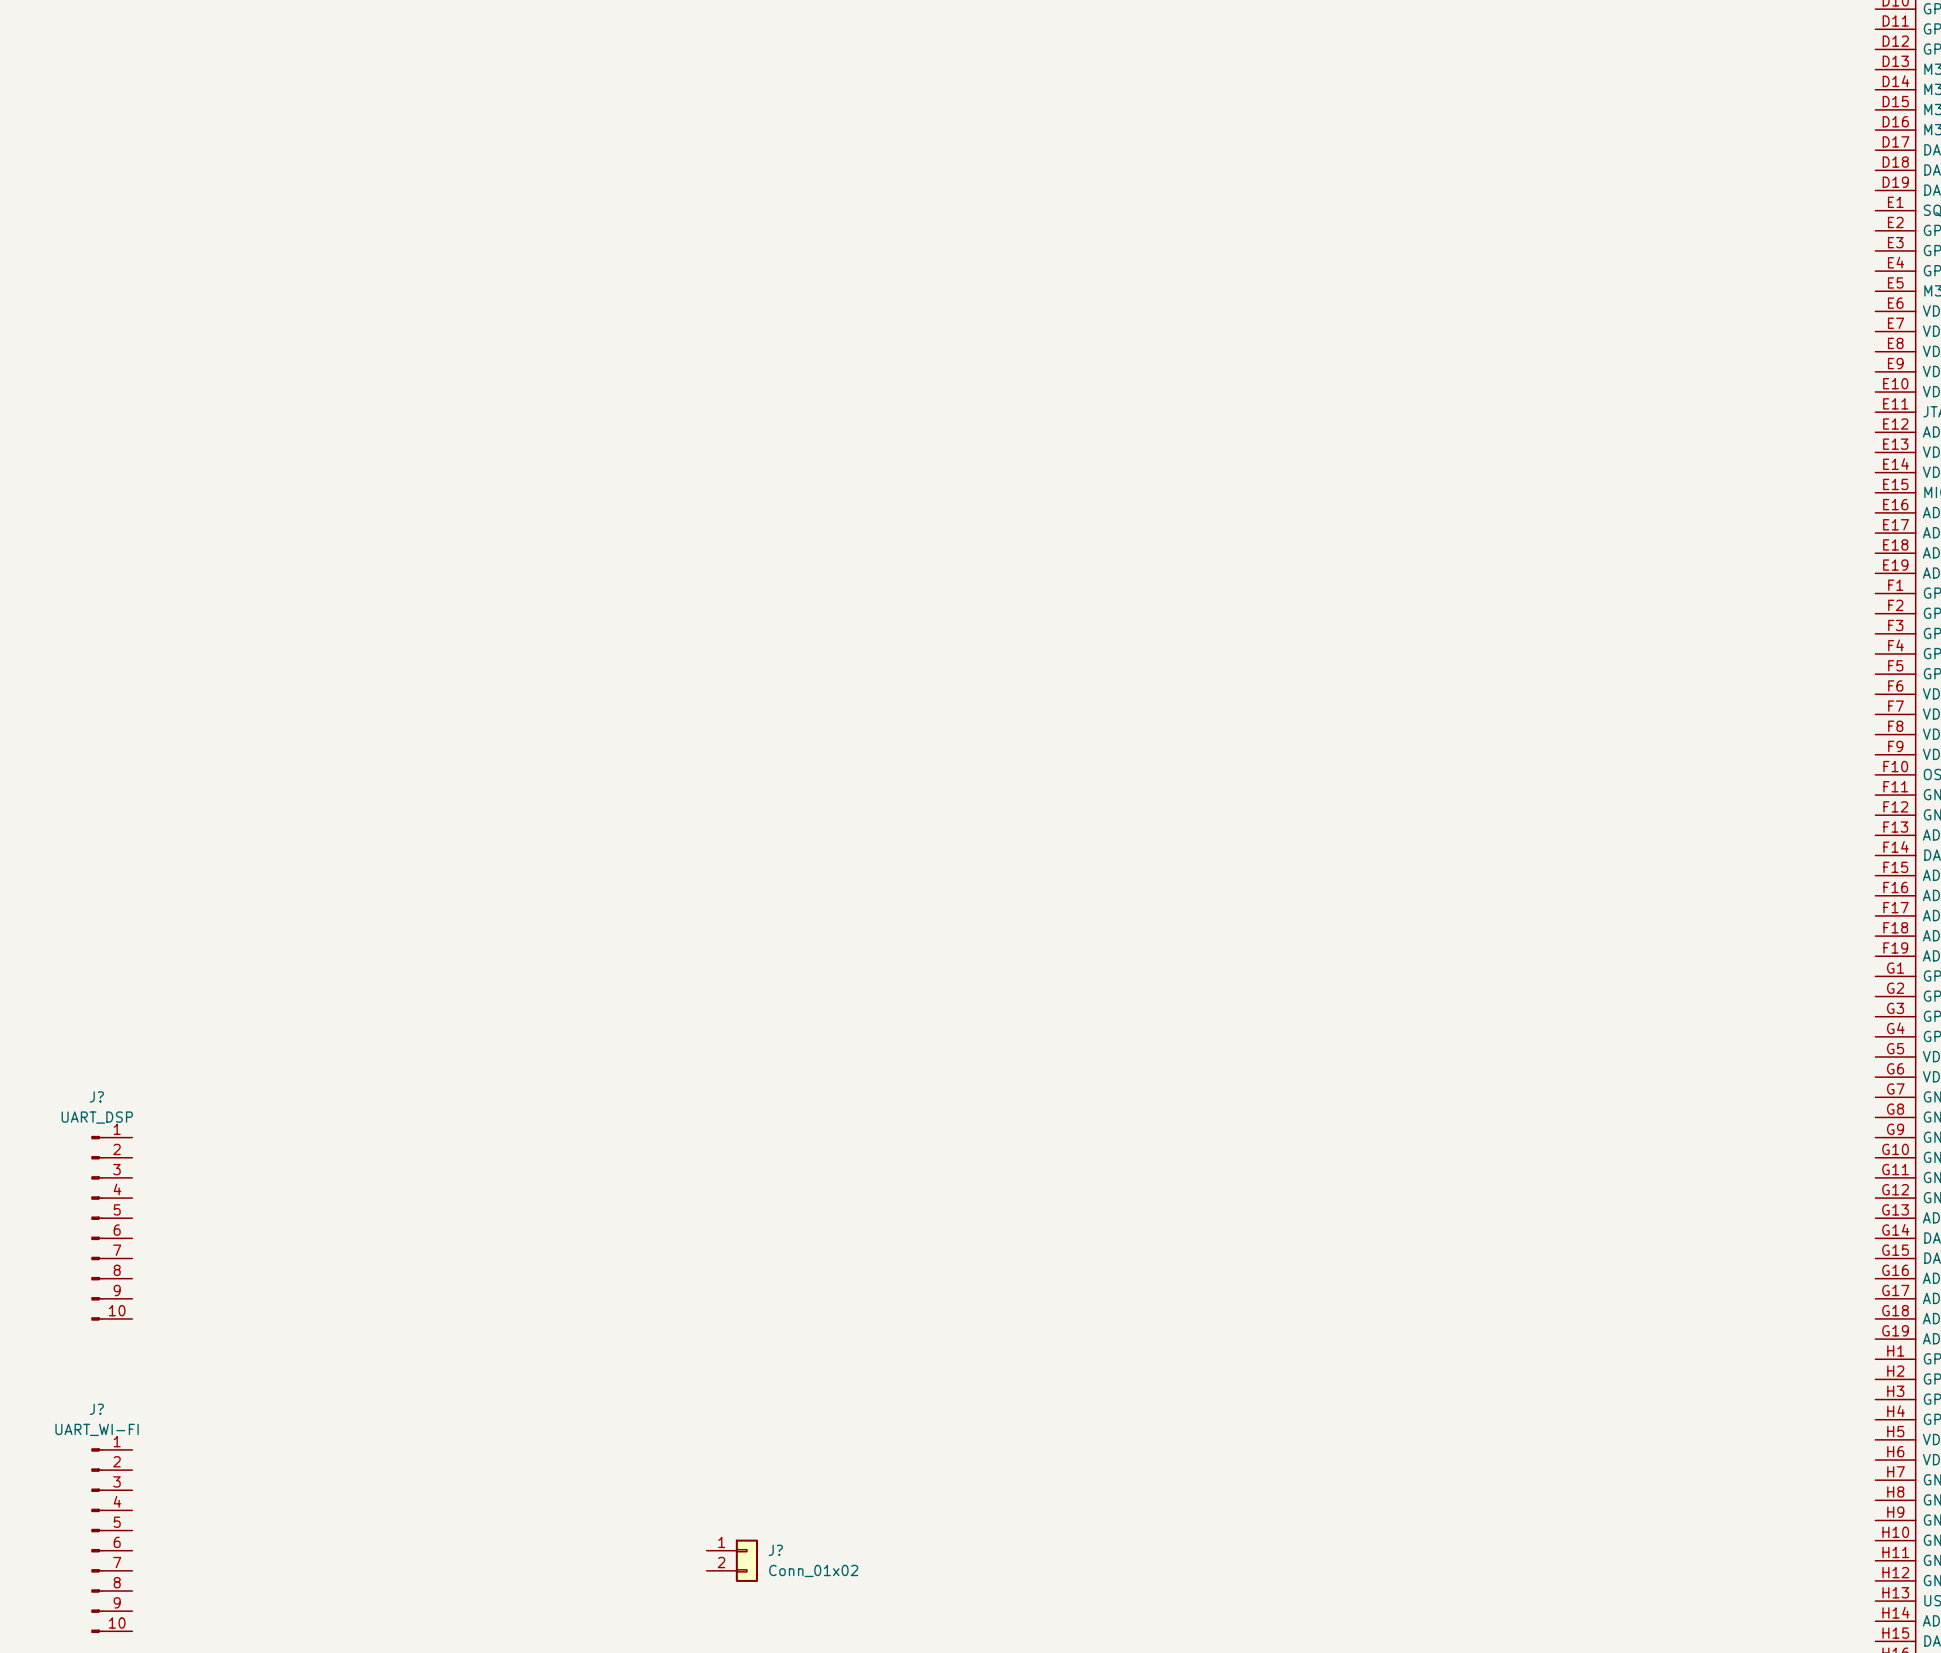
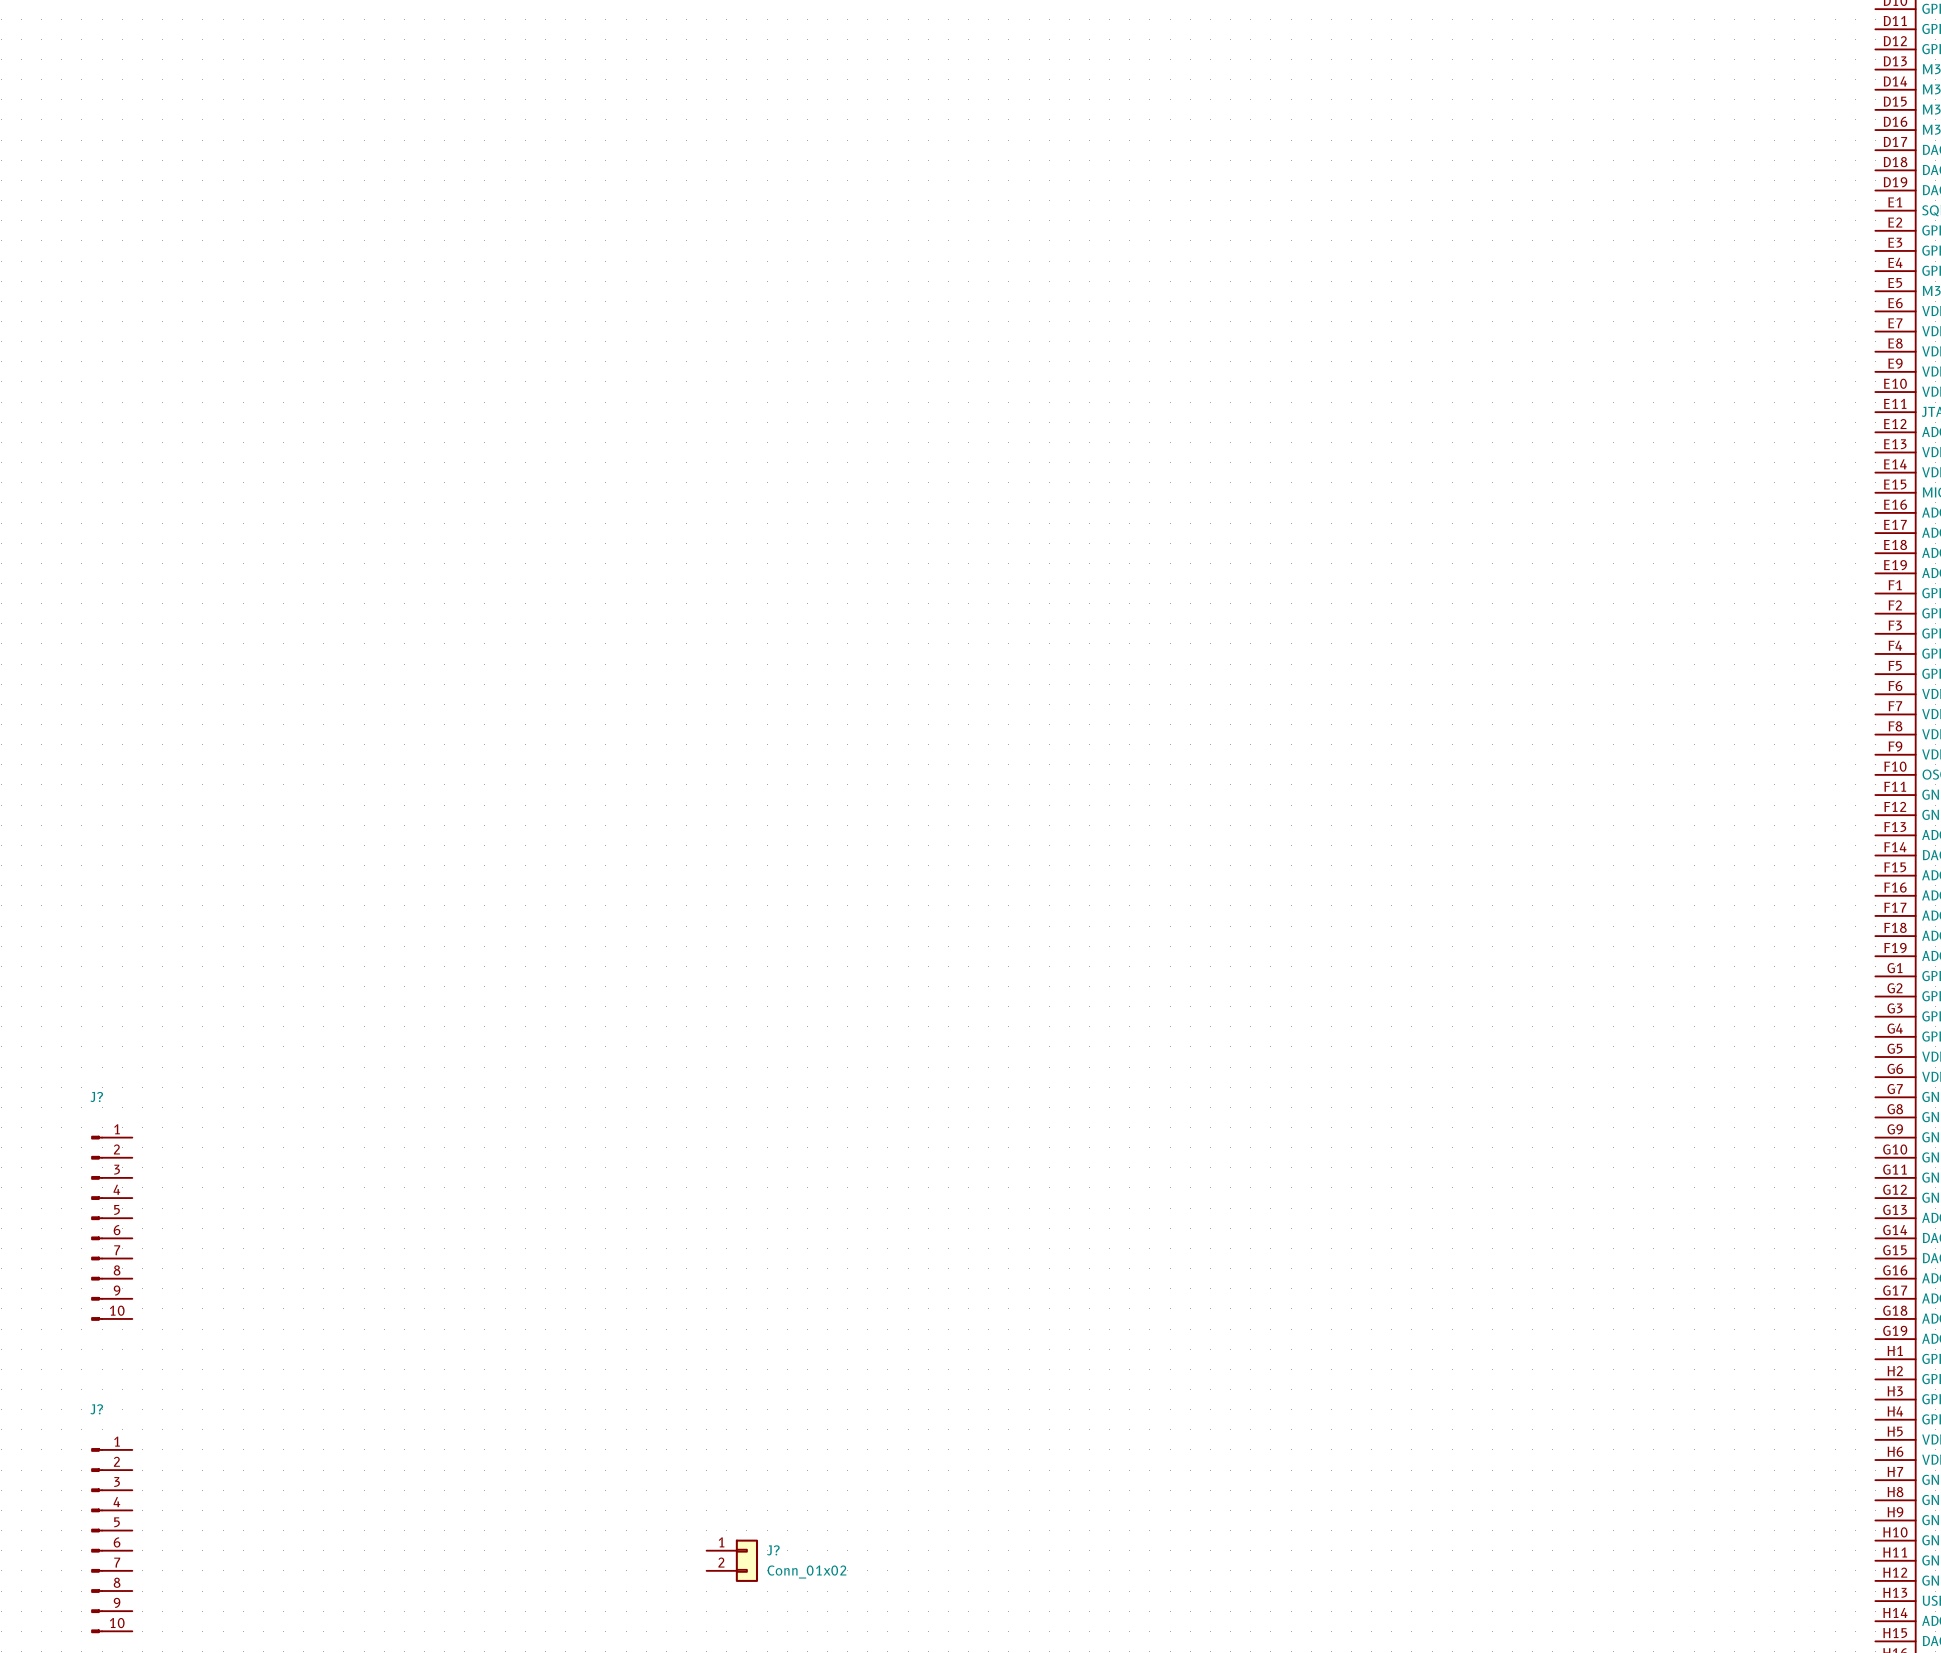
J? value: UART_DSP (97, 1117) -> none
J? value: UART_WI-FI (97, 1429) -> none

